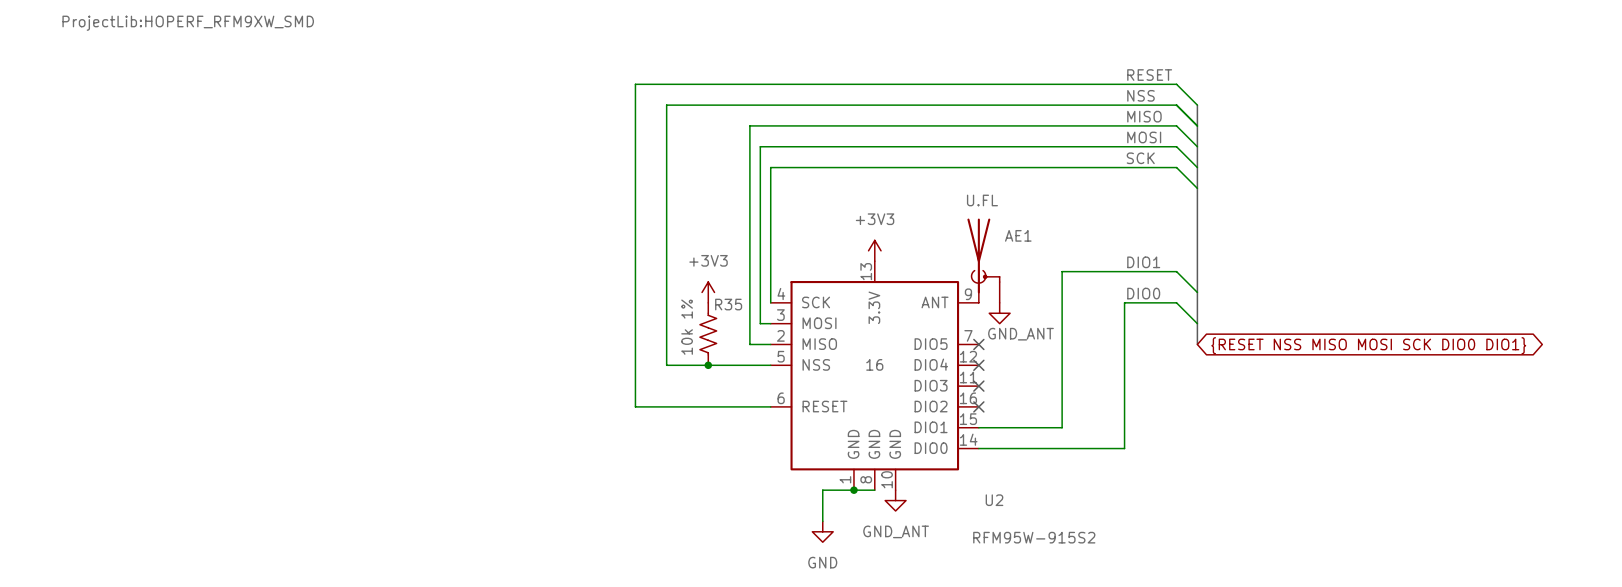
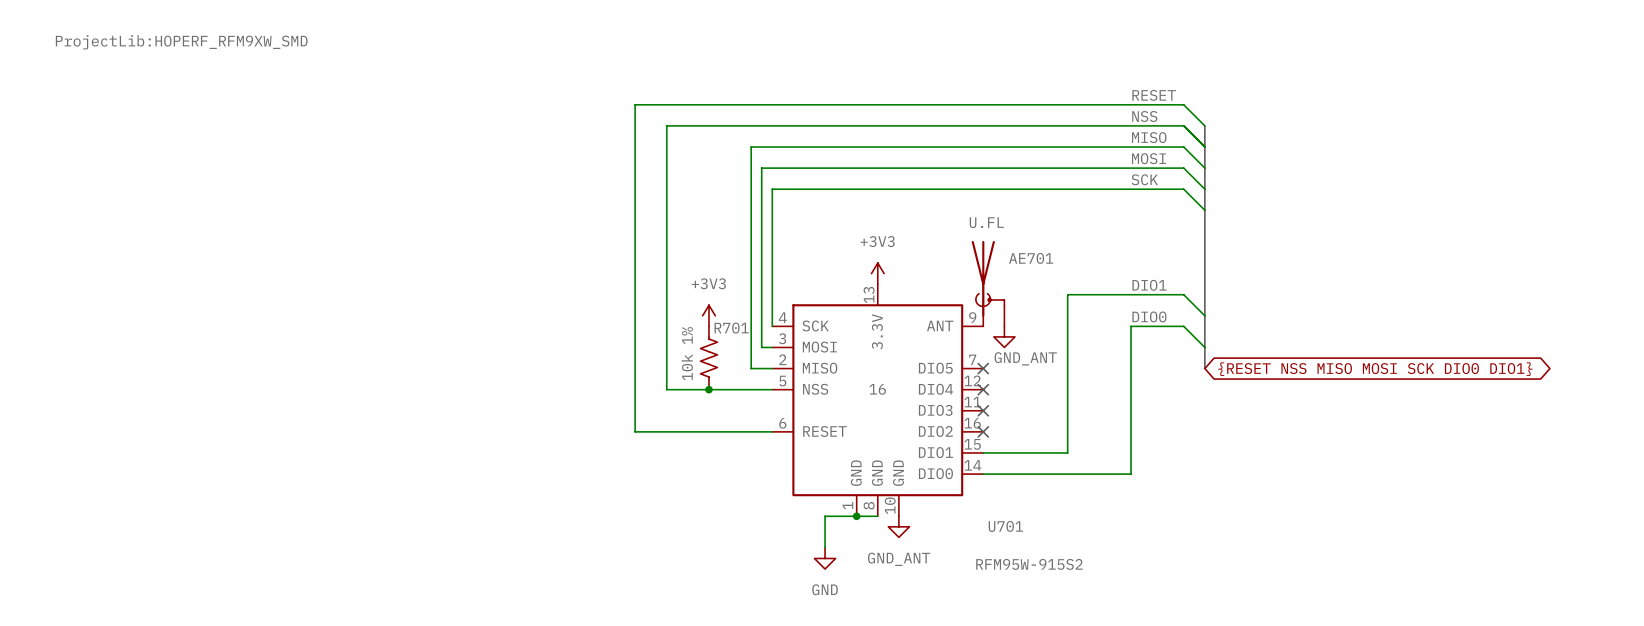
AE1 name: AE1 (1018, 235) -> AE701 (1031, 258)
R35 name: R35 (728, 304) -> R701 (731, 328)
U2 name: U2 (994, 500) -> U701 (1005, 526)

